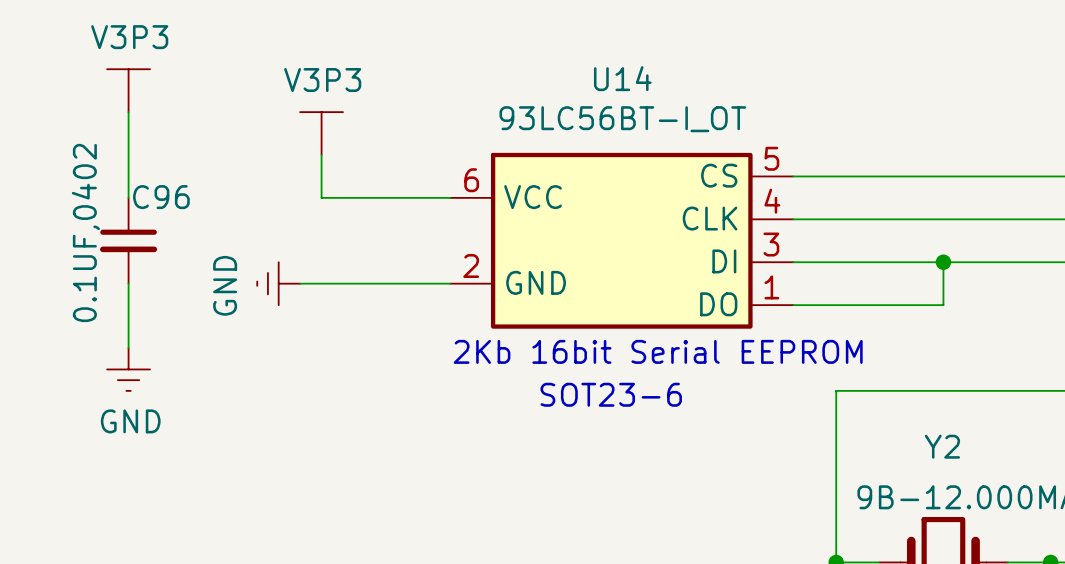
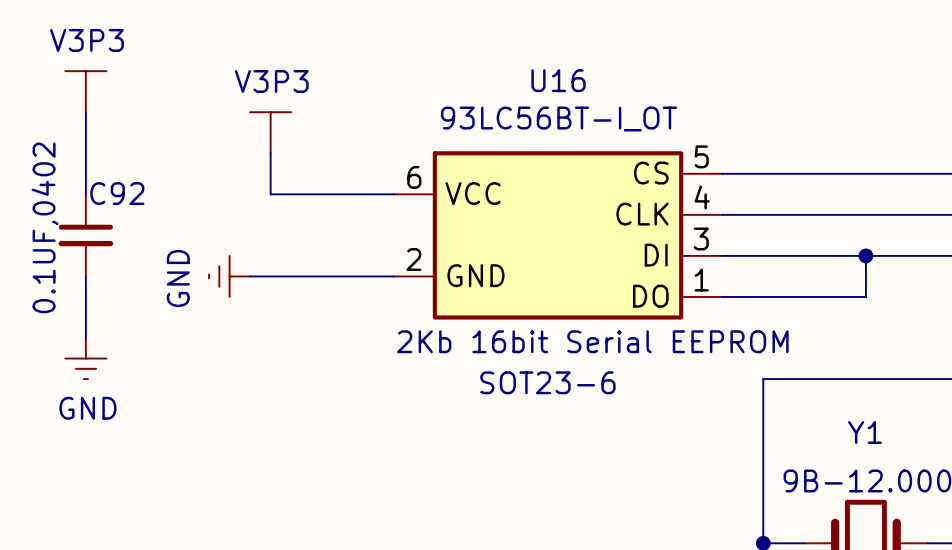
U14 name: U14 (622, 78) -> U16 (558, 80)
C96 name: C96 (161, 197) -> C92 (117, 193)
Y2 name: Y2 (942, 446) -> Y1 (864, 432)

